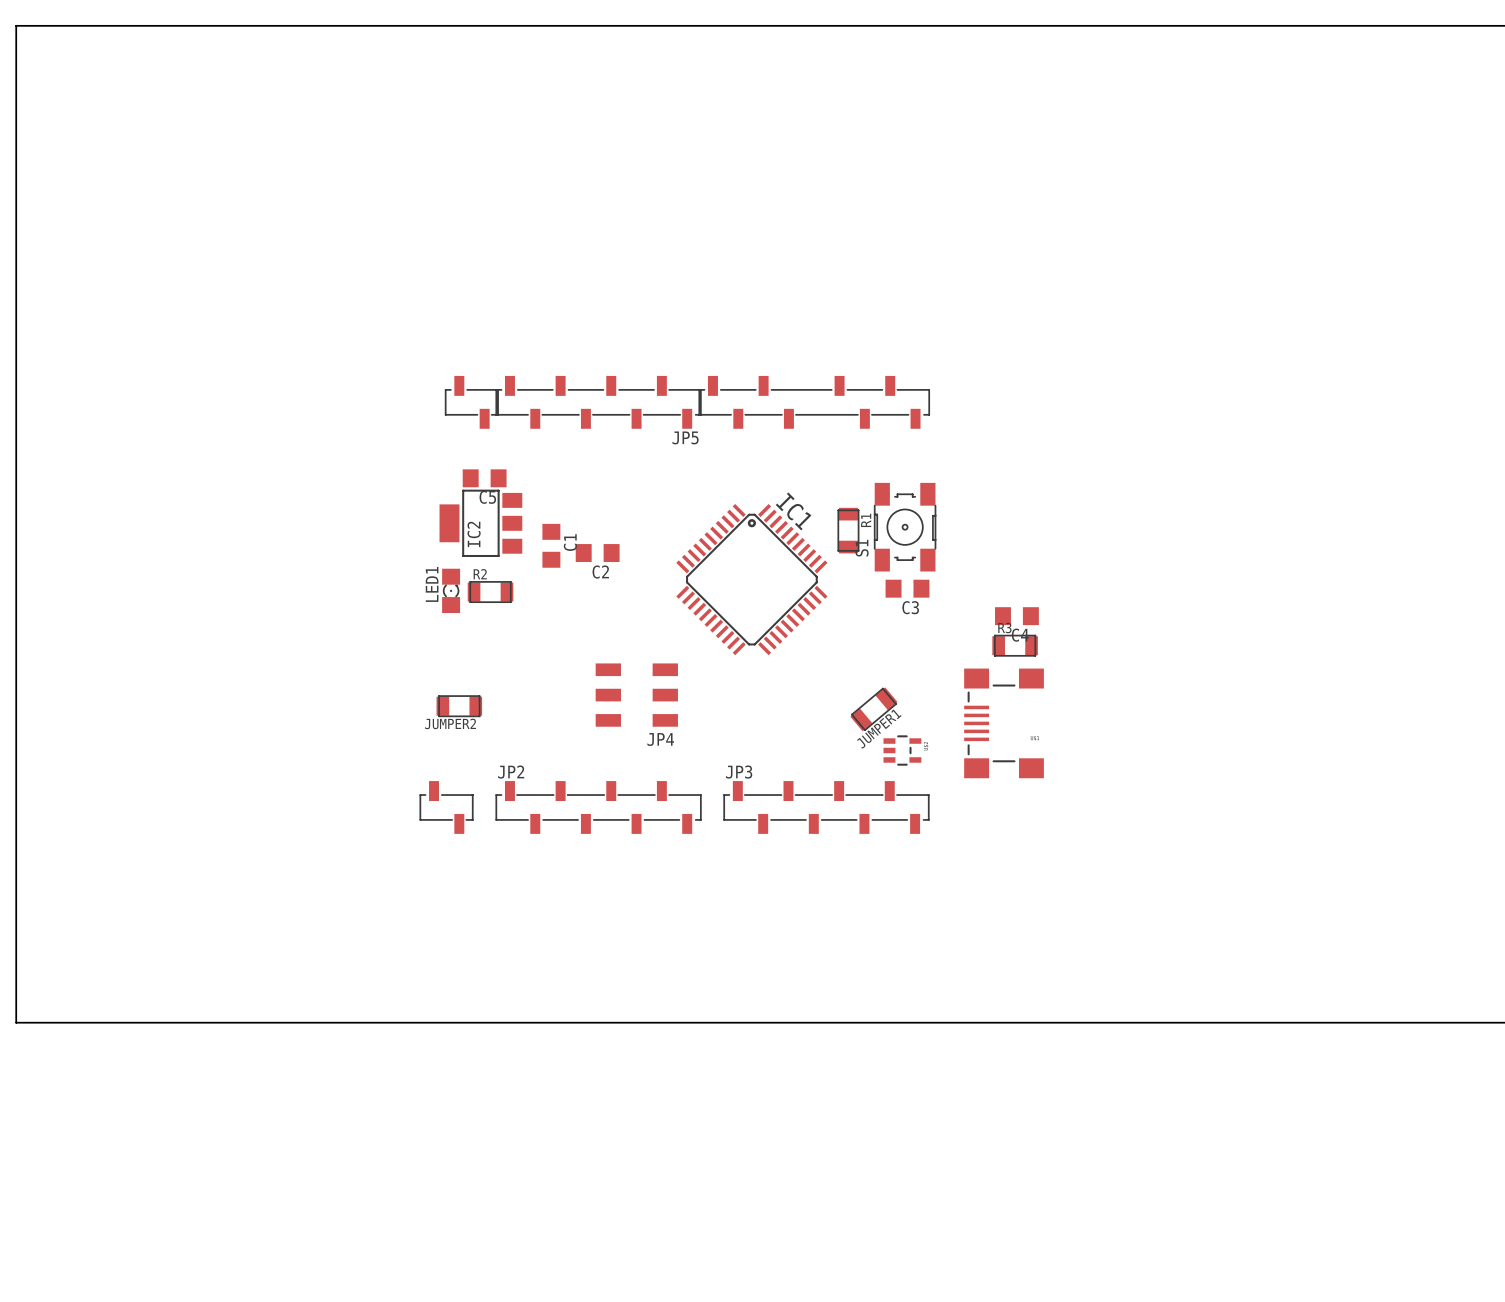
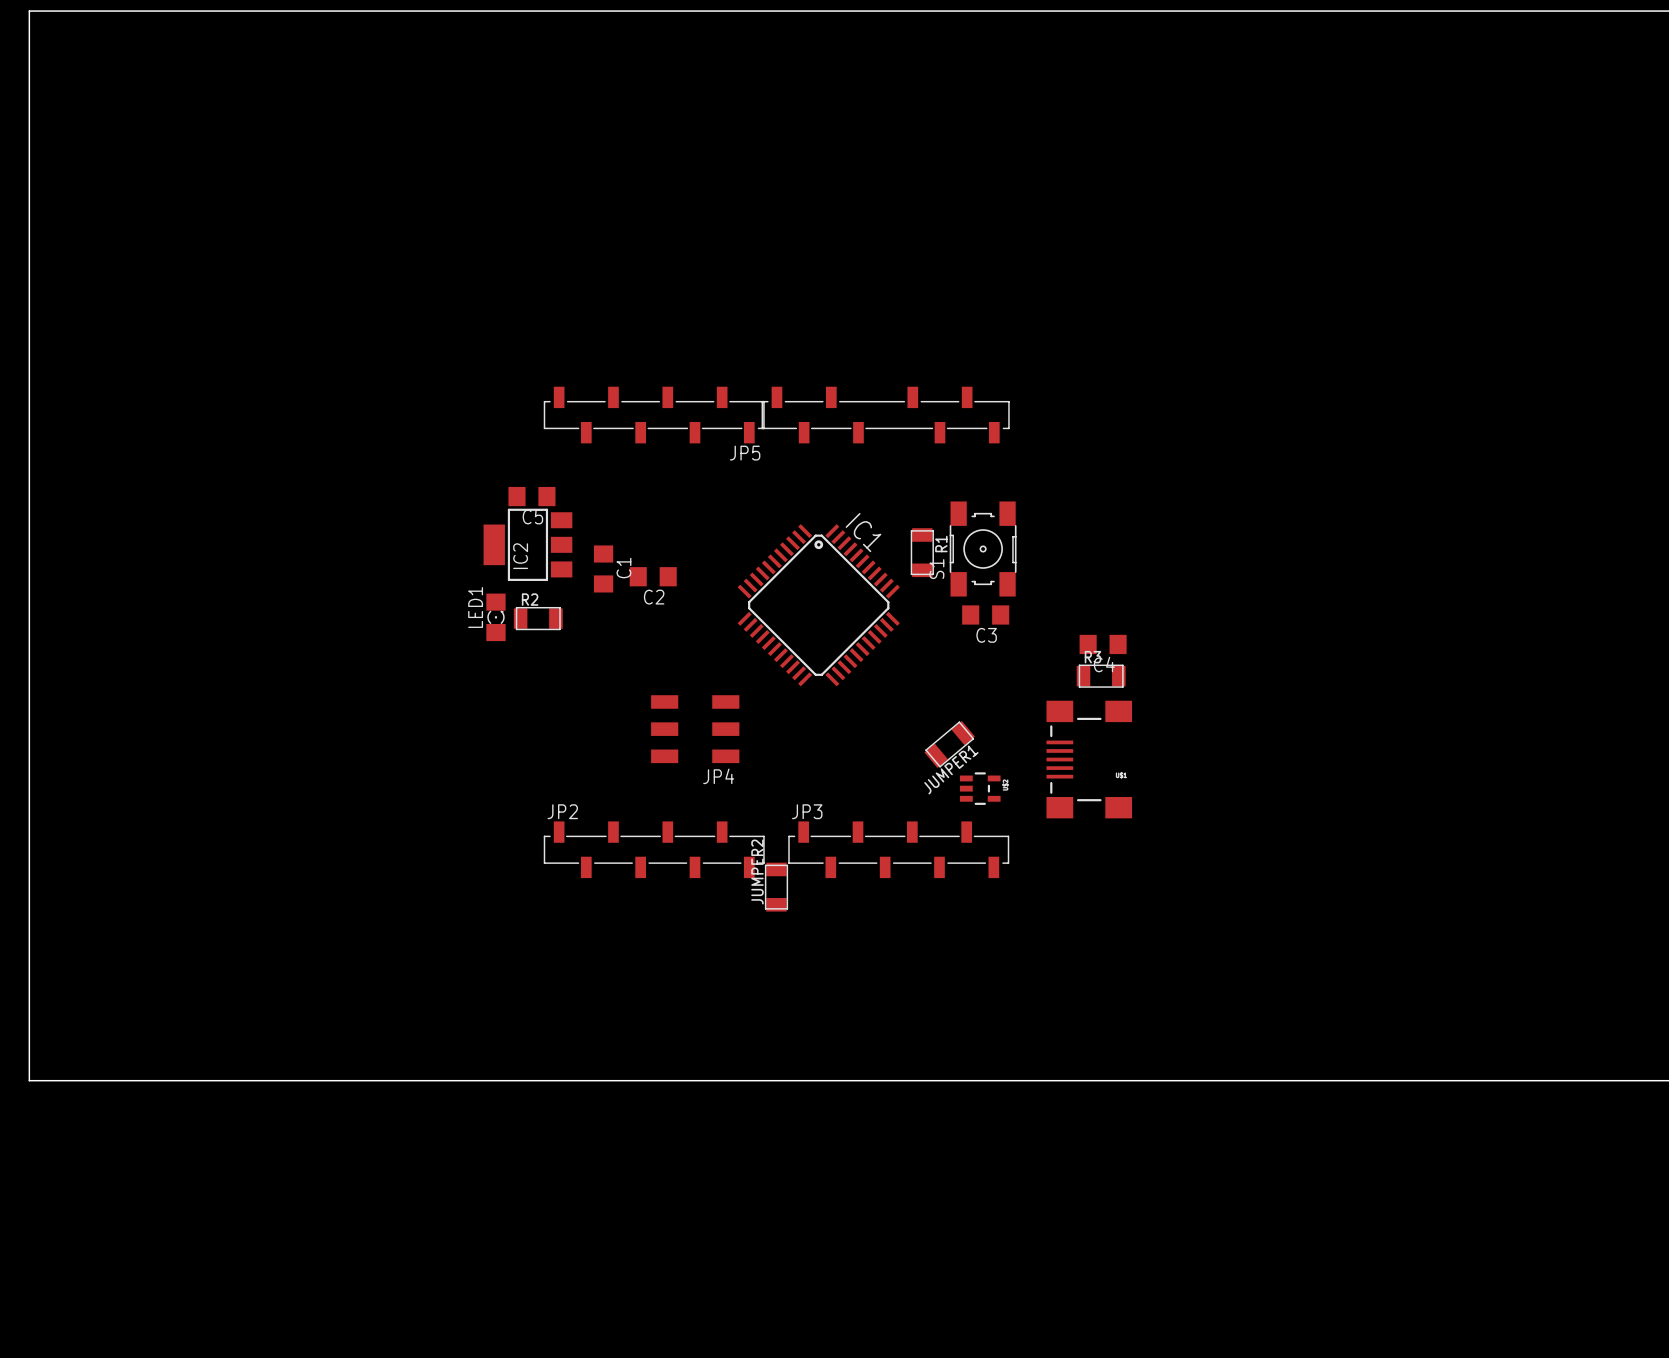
part: (471, 402) -> none
JUMPER2 rotation: 0° (459, 706) -> 90° clockwise (776, 887)
JUMPER2 position: (459, 706) -> (776, 887)
part: (446, 807) -> none

